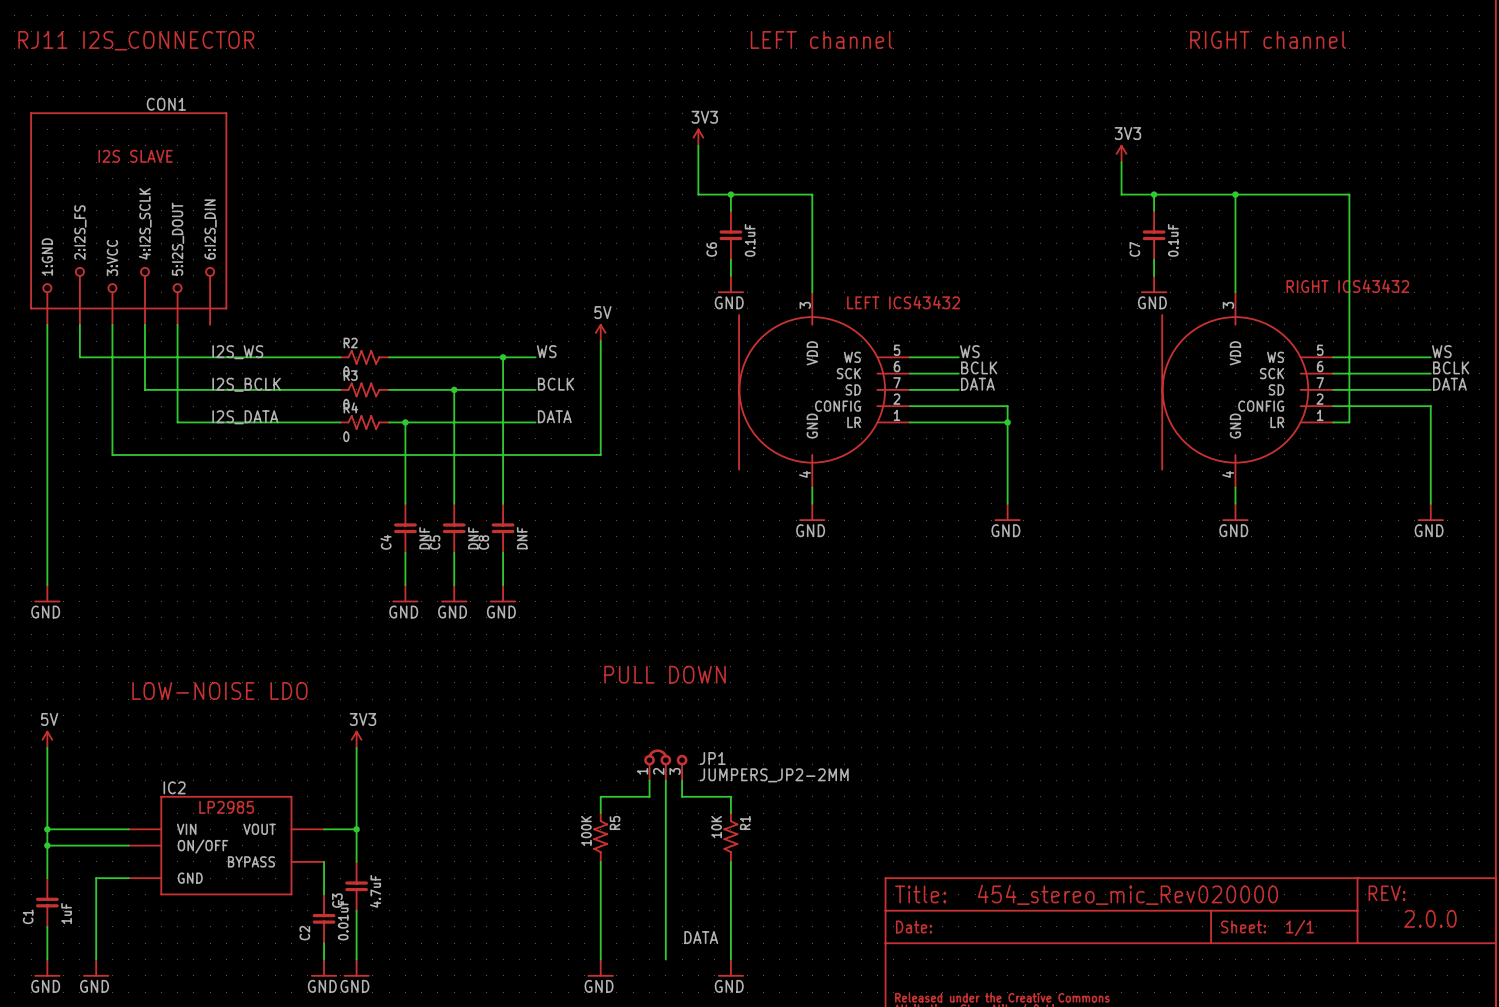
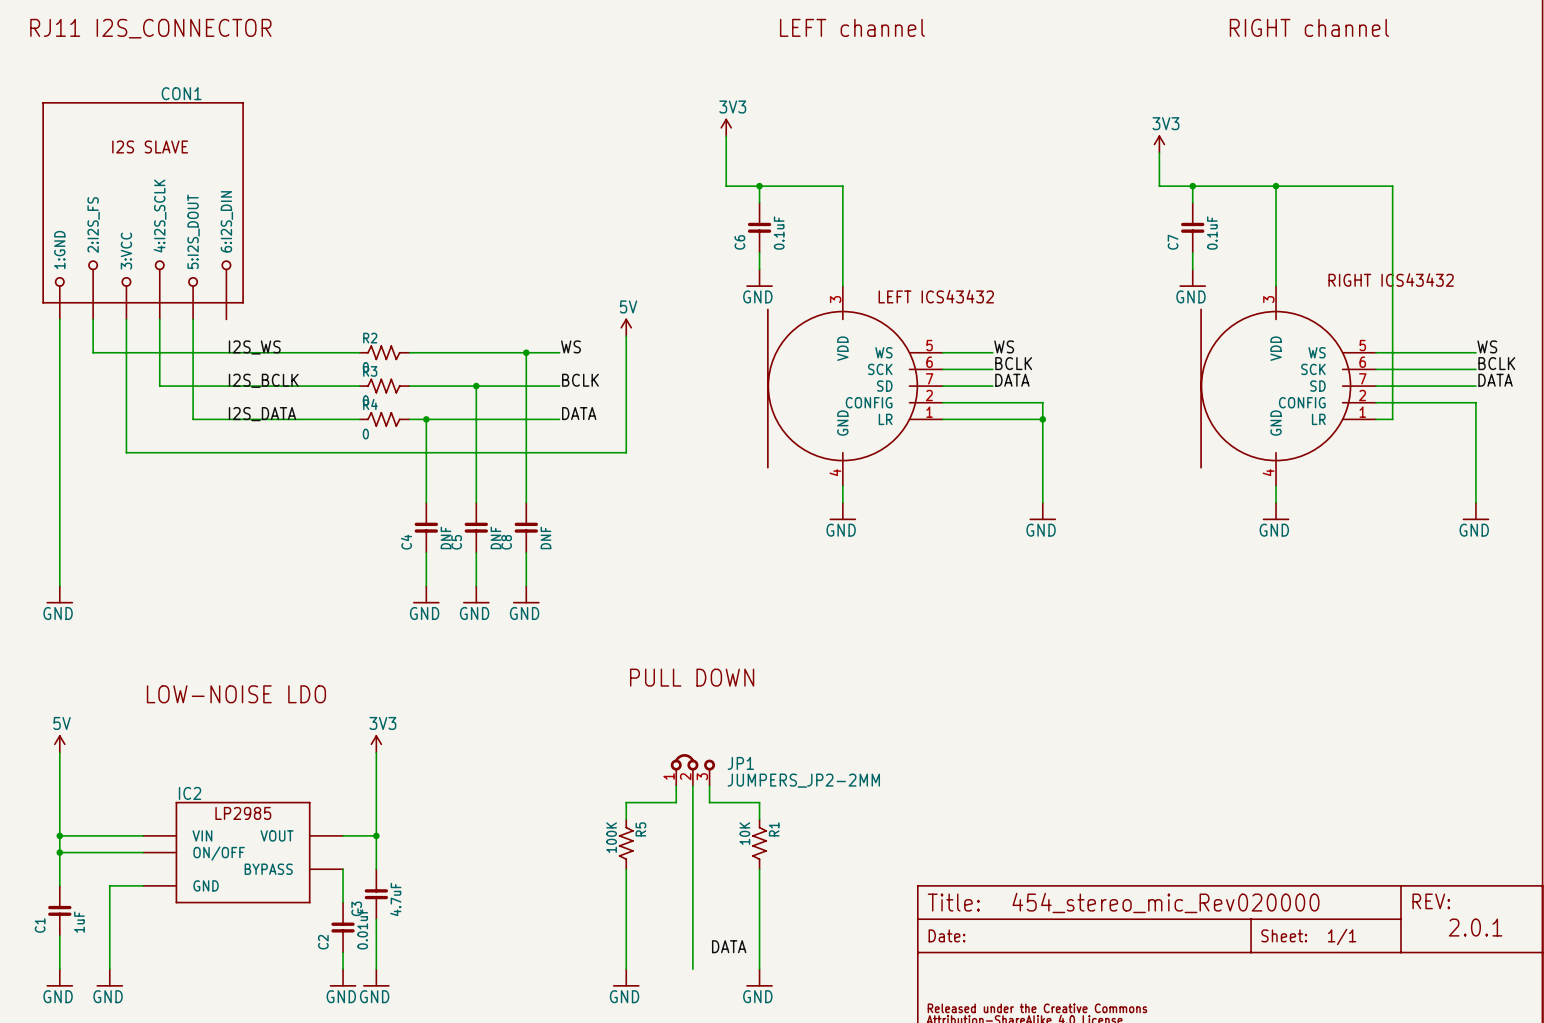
text: 2.0.0 (1430, 918) -> 2.0.1 (1475, 927)

